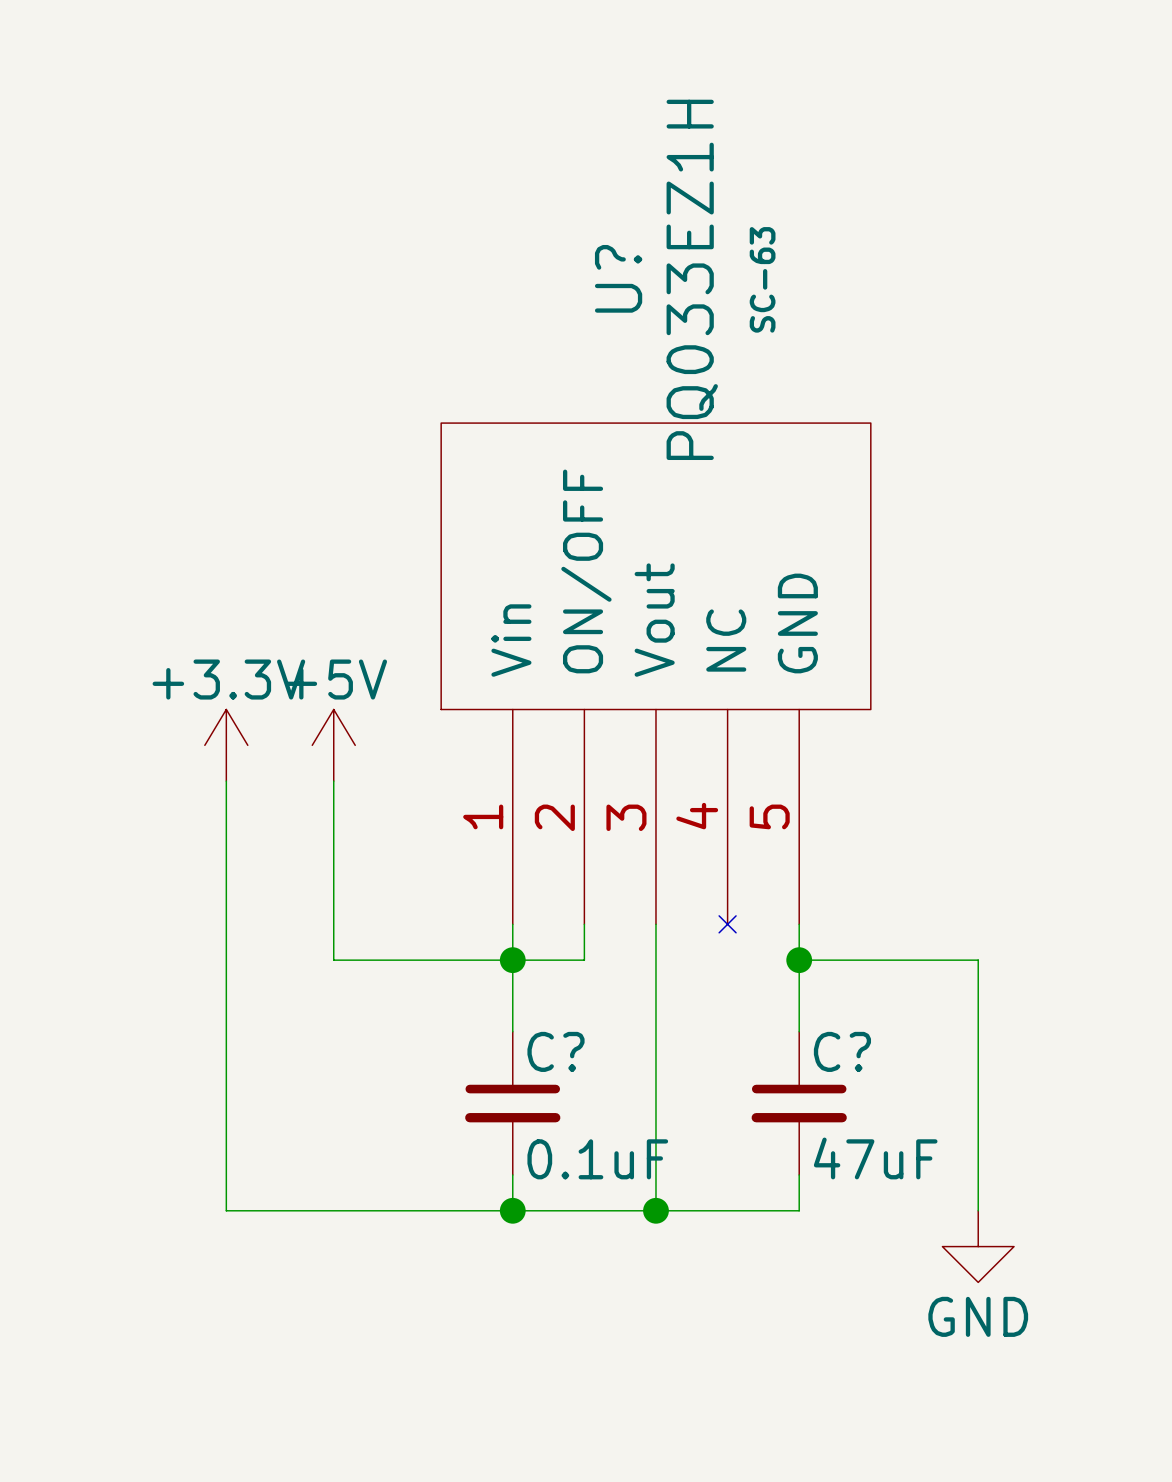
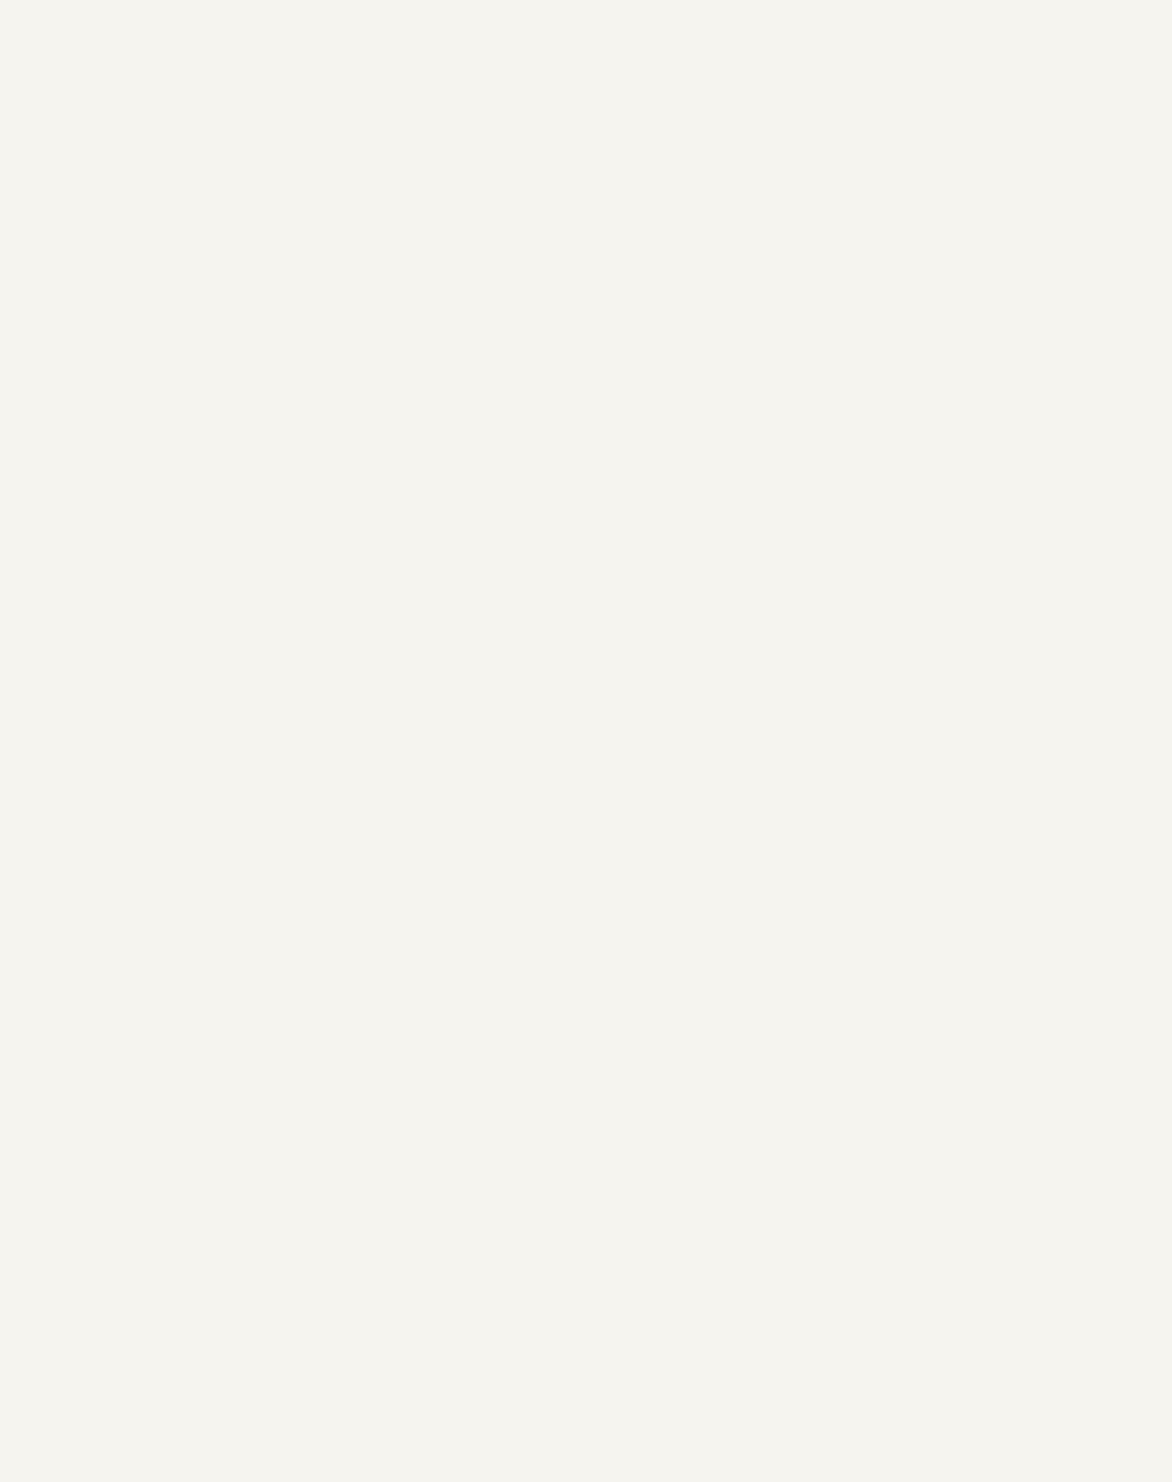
U?: PQ033EZ1H (655, 677) -> none
power symbol: +3.3V (226, 745) -> none
power symbol: +5V (333, 745) -> none
wire: (226, 781) (226, 1210) (799, 1210) (799, 1174) -> none
wire: (333, 781) (333, 960) (584, 960) (584, 924) -> none
wire: (512, 924) (512, 1031) -> none
wire: (655, 924) (655, 1210) -> none
wire: (799, 924) (799, 1031) -> none
junction: (512, 960) -> none
wire: (799, 960) (978, 960) (978, 1210) -> none
junction: (799, 960) -> none
C?: 0.1uF (512, 1103) -> none
C?: 47uF (799, 1103) -> none
wire: (512, 1174) (512, 1210) -> none
junction: (512, 1210) -> none
junction: (655, 1210) -> none
power symbol: GND (978, 1246) -> none

